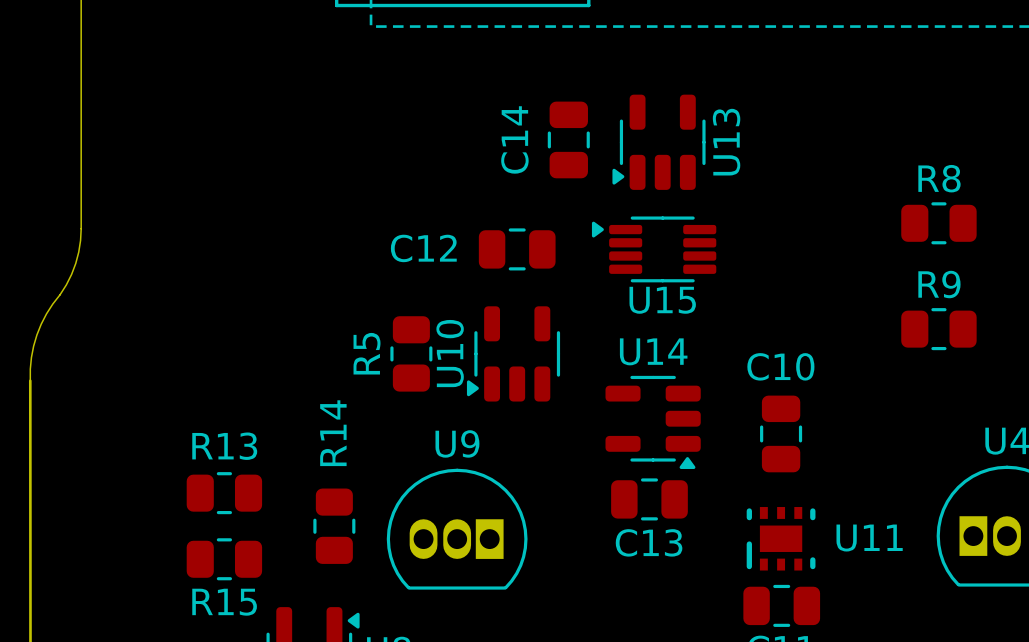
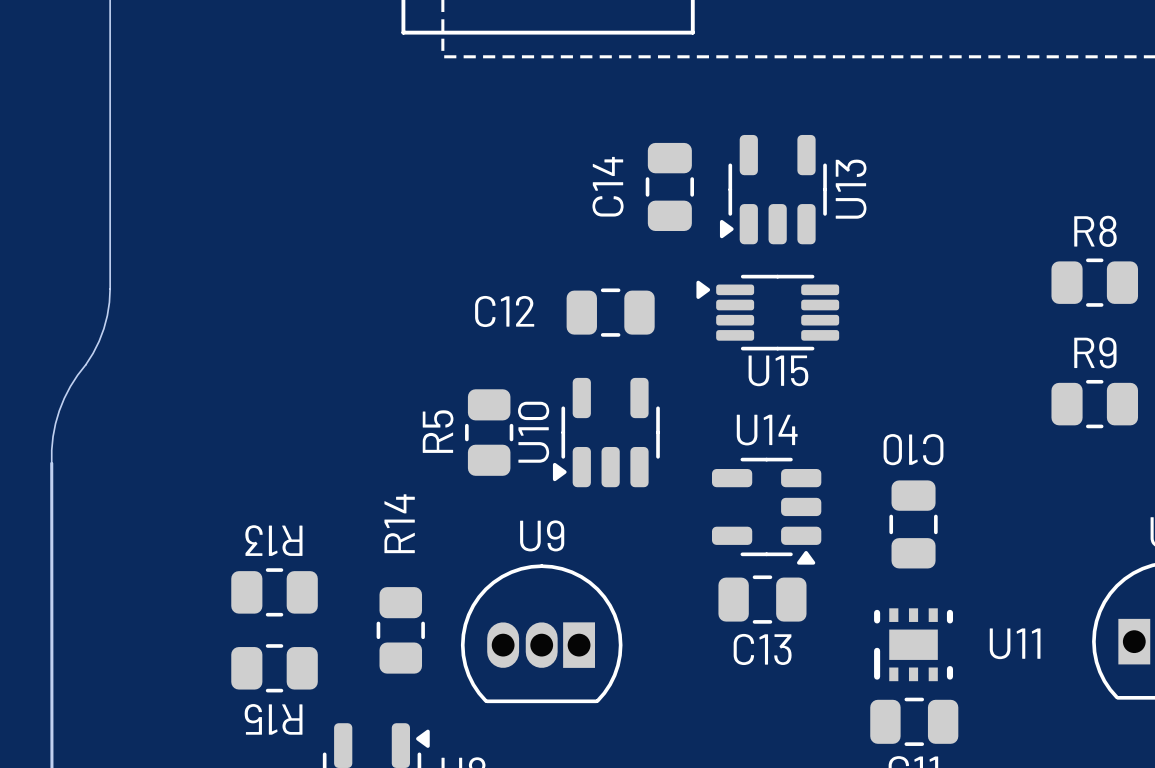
C10 name rotation: 0° (780, 366) -> 180° (913, 449)
R13 name rotation: 0° (224, 446) -> 180° (273, 540)
R15 name rotation: 0° (224, 602) -> 180° (273, 719)

